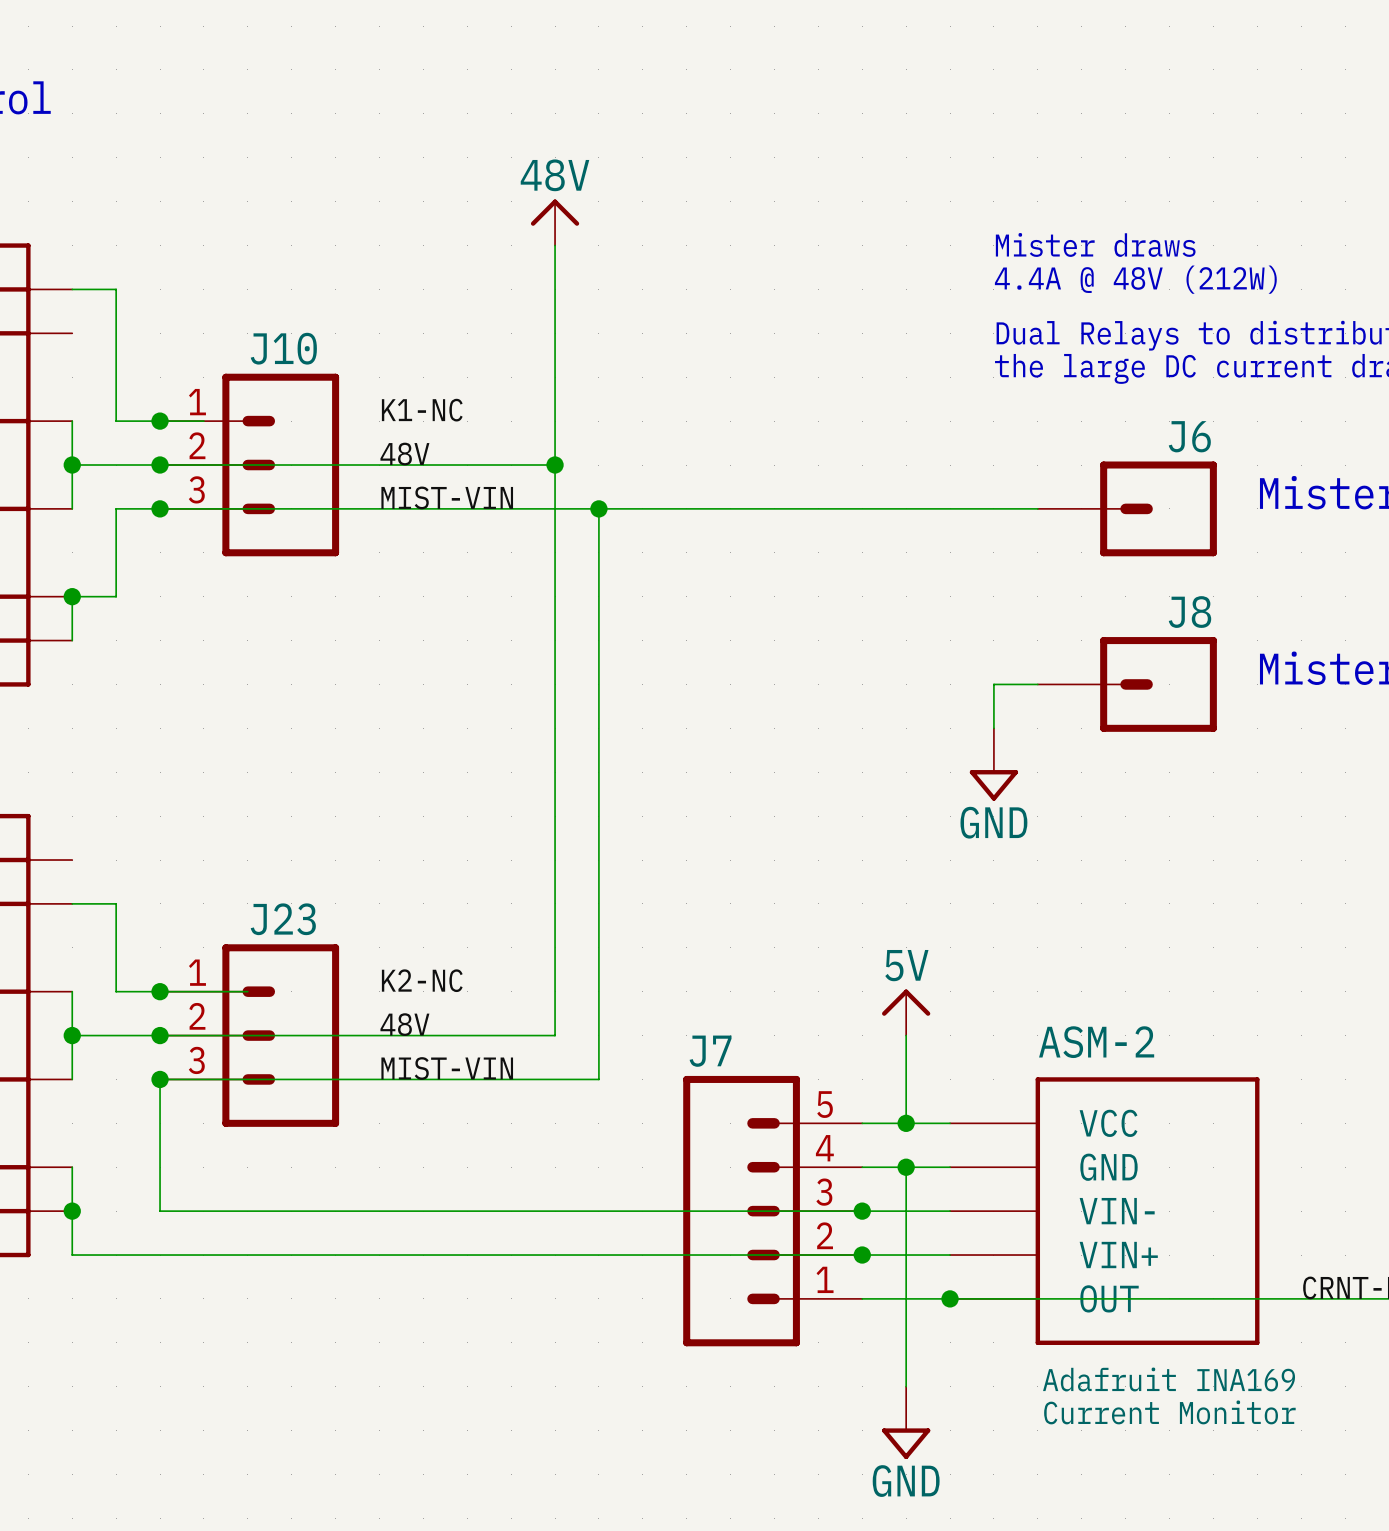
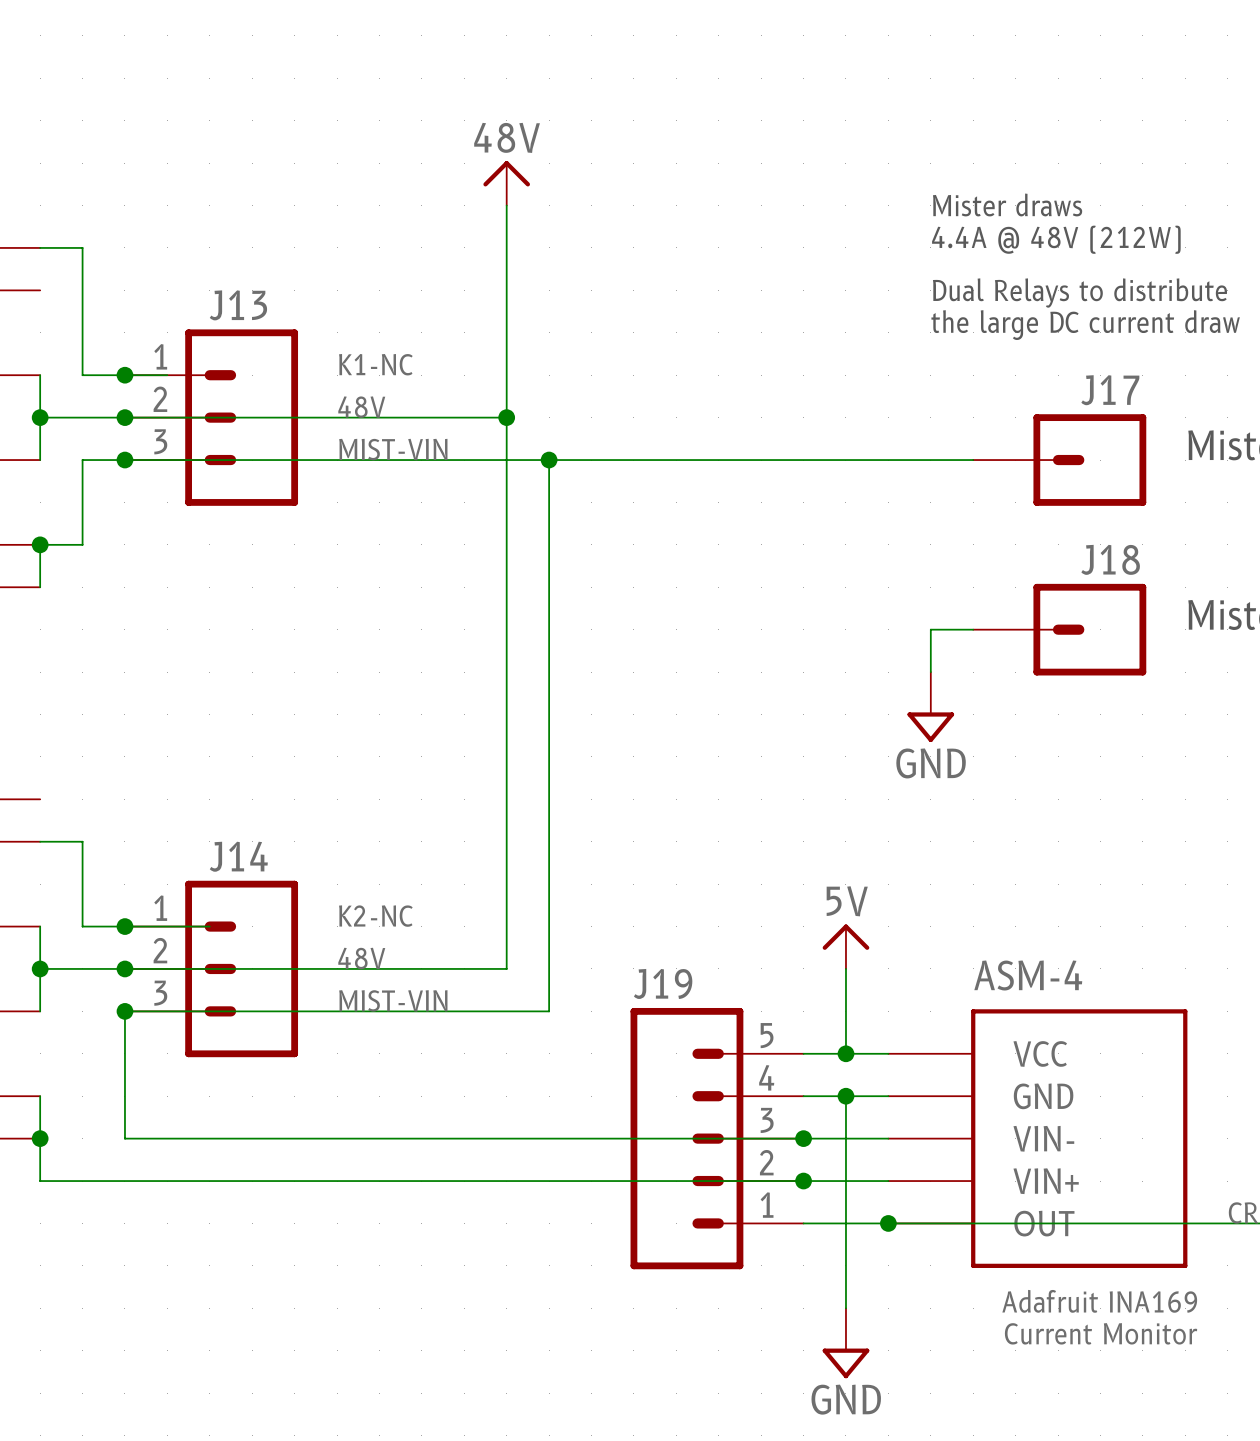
J10 name: J10 (283, 348) -> J13 (238, 305)
J6 name: J6 (1189, 436) -> J17 (1110, 390)
J8 name: J8 (1189, 612) -> J18 (1110, 559)
J23 name: J23 (283, 919) -> J14 (238, 856)
ASM-2 name: ASM-2 (1096, 1042) -> ASM-4 (1028, 975)
J7 name: J7 (710, 1051) -> J19 (663, 983)

